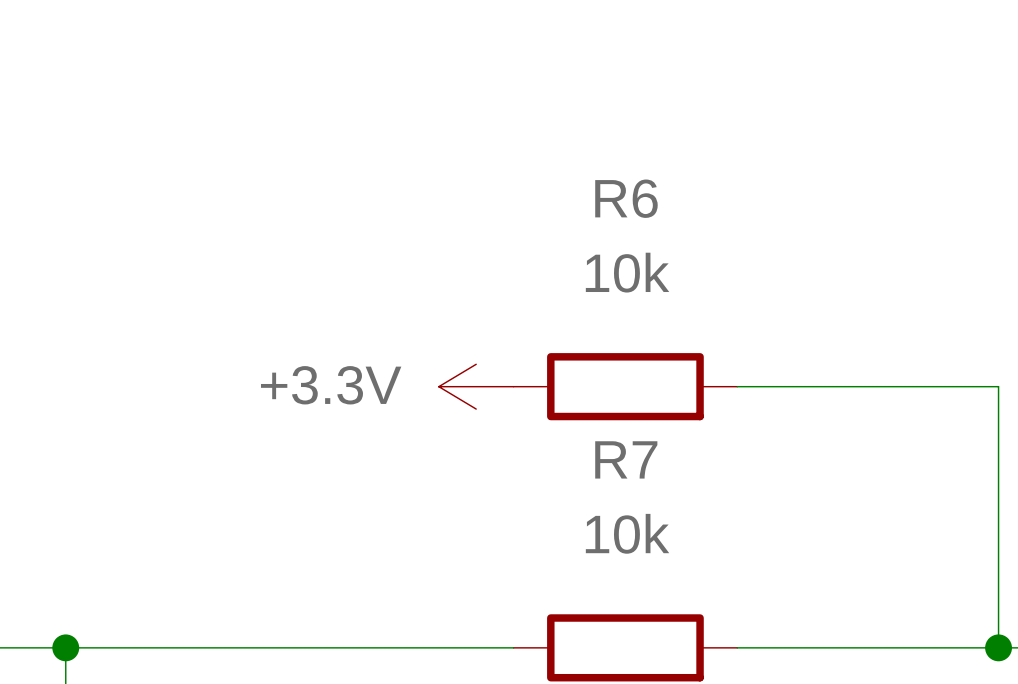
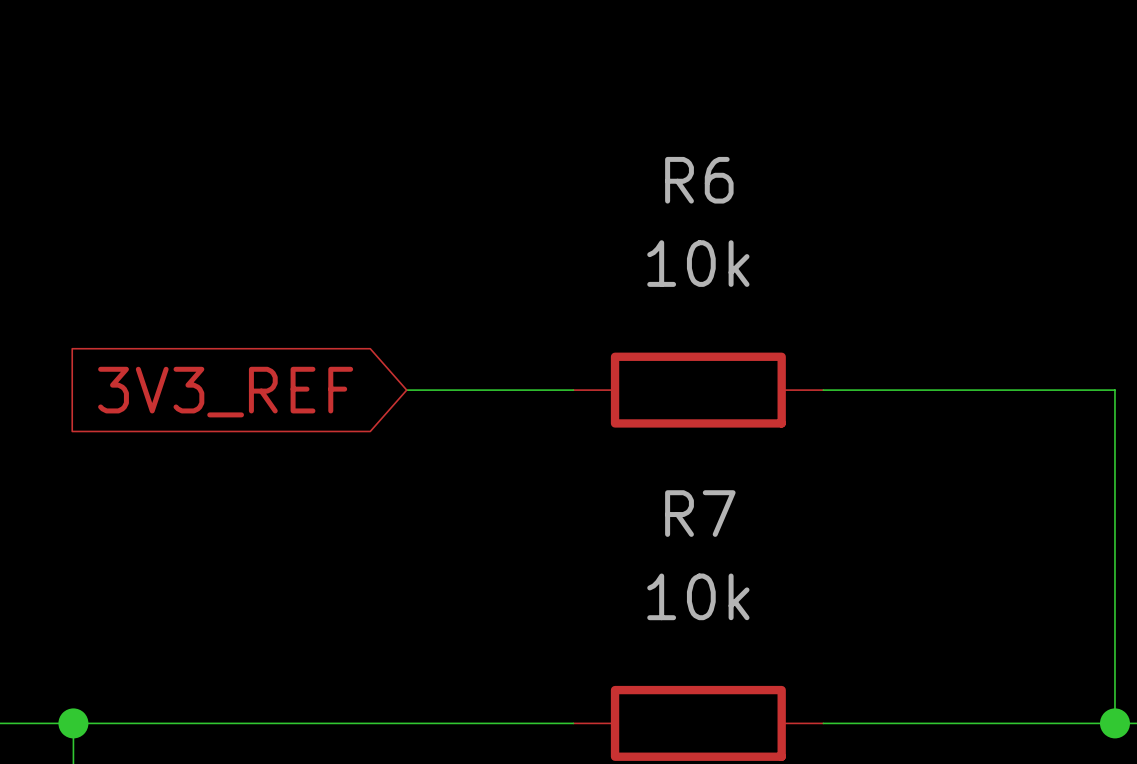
wire: none -> (406, 390) (573, 390)
global label: none -> 3V3_REF (225, 392)
power symbol: +3.3V (476, 386) -> none
R6 position: (625, 386) -> (698, 390)
wire: (737, 386) (998, 386) -> (823, 390) (1114, 390) (1114, 431)

